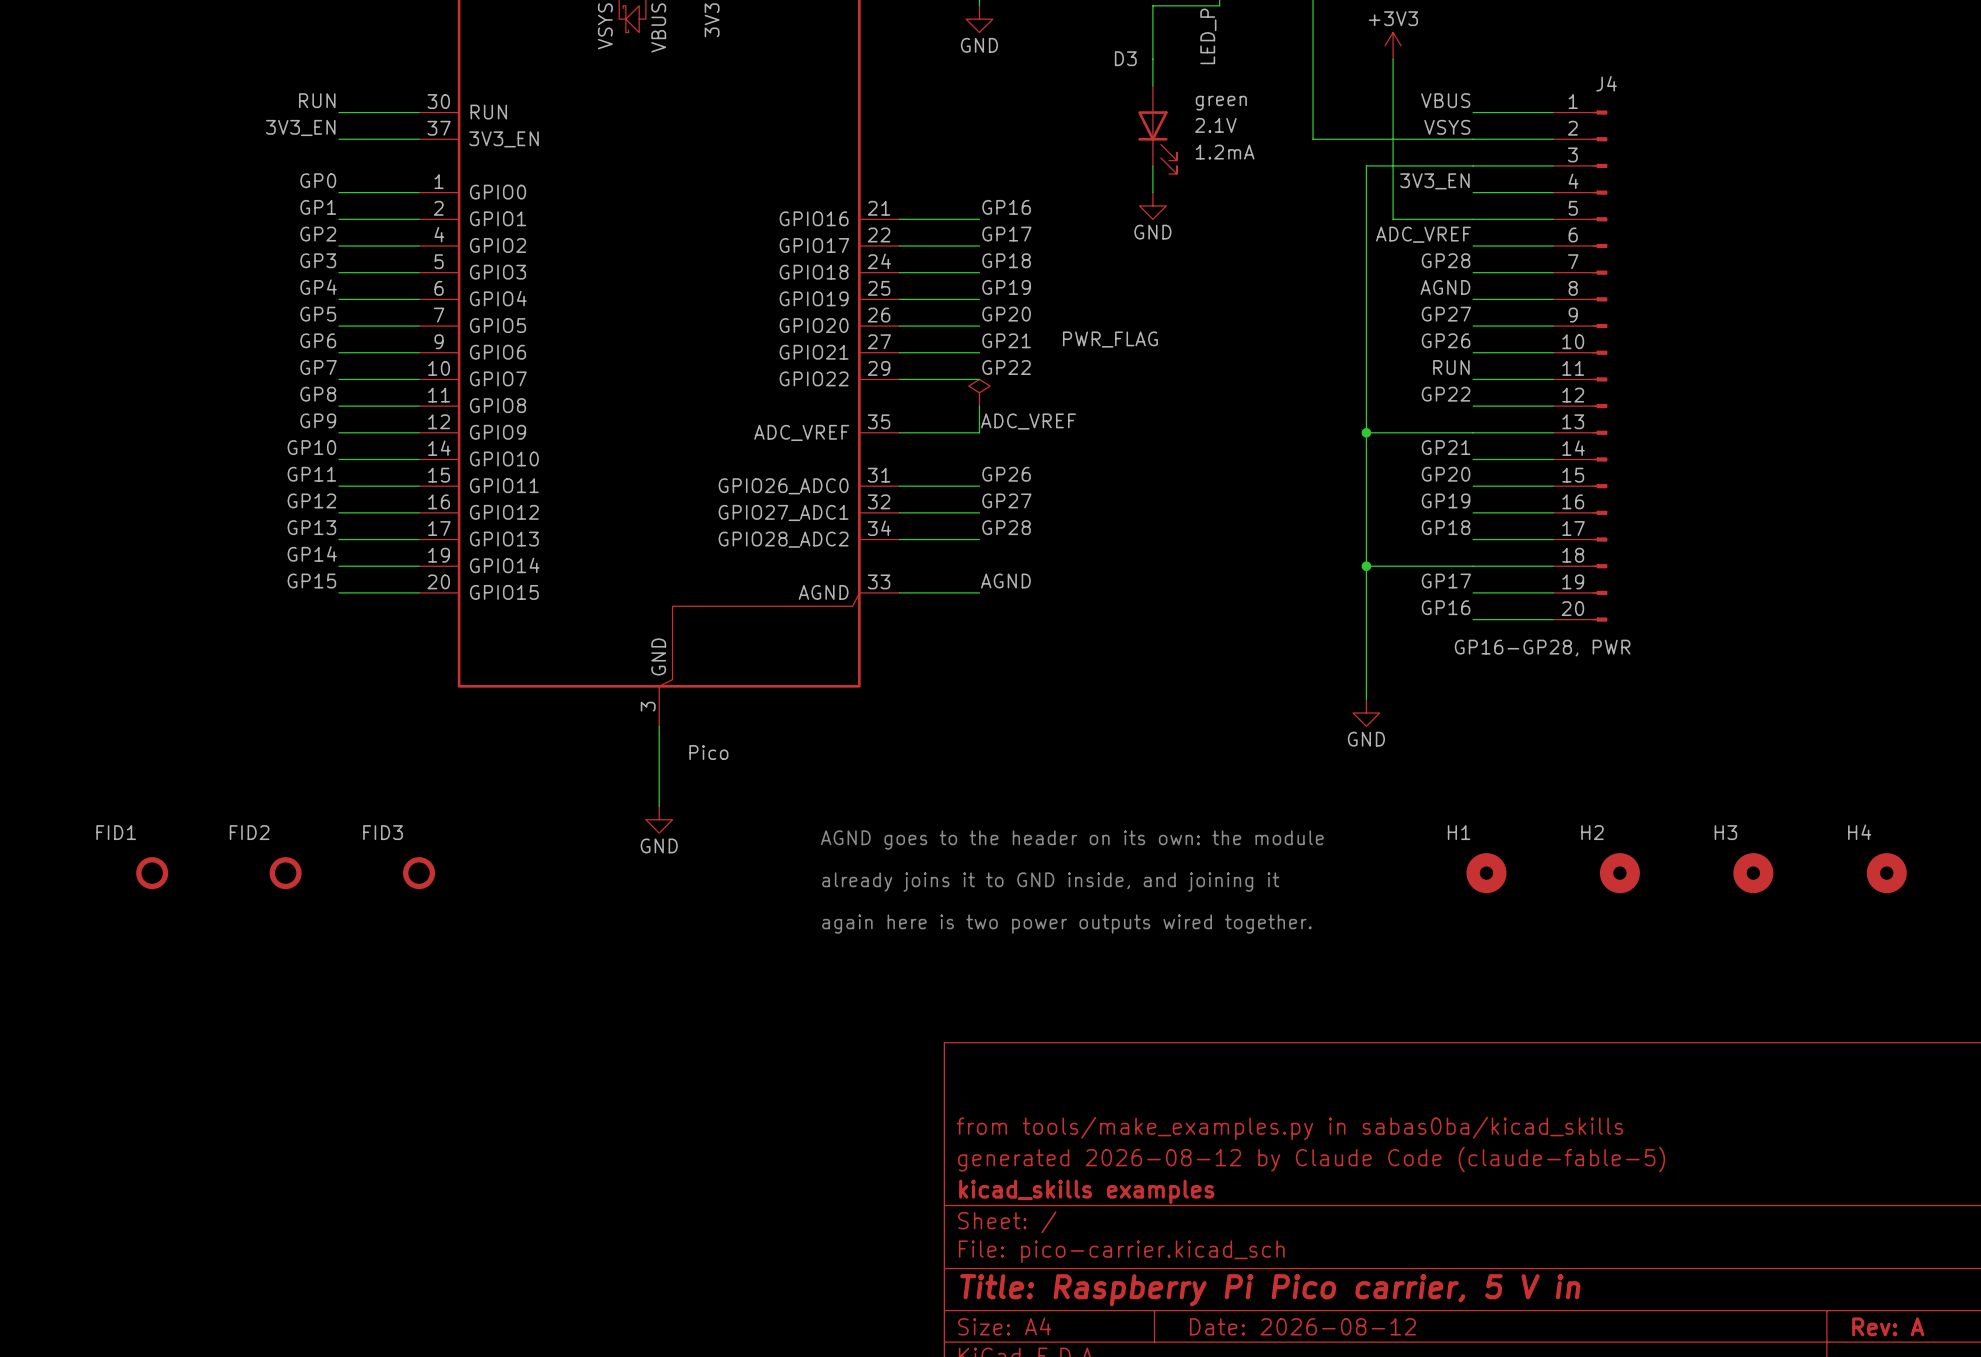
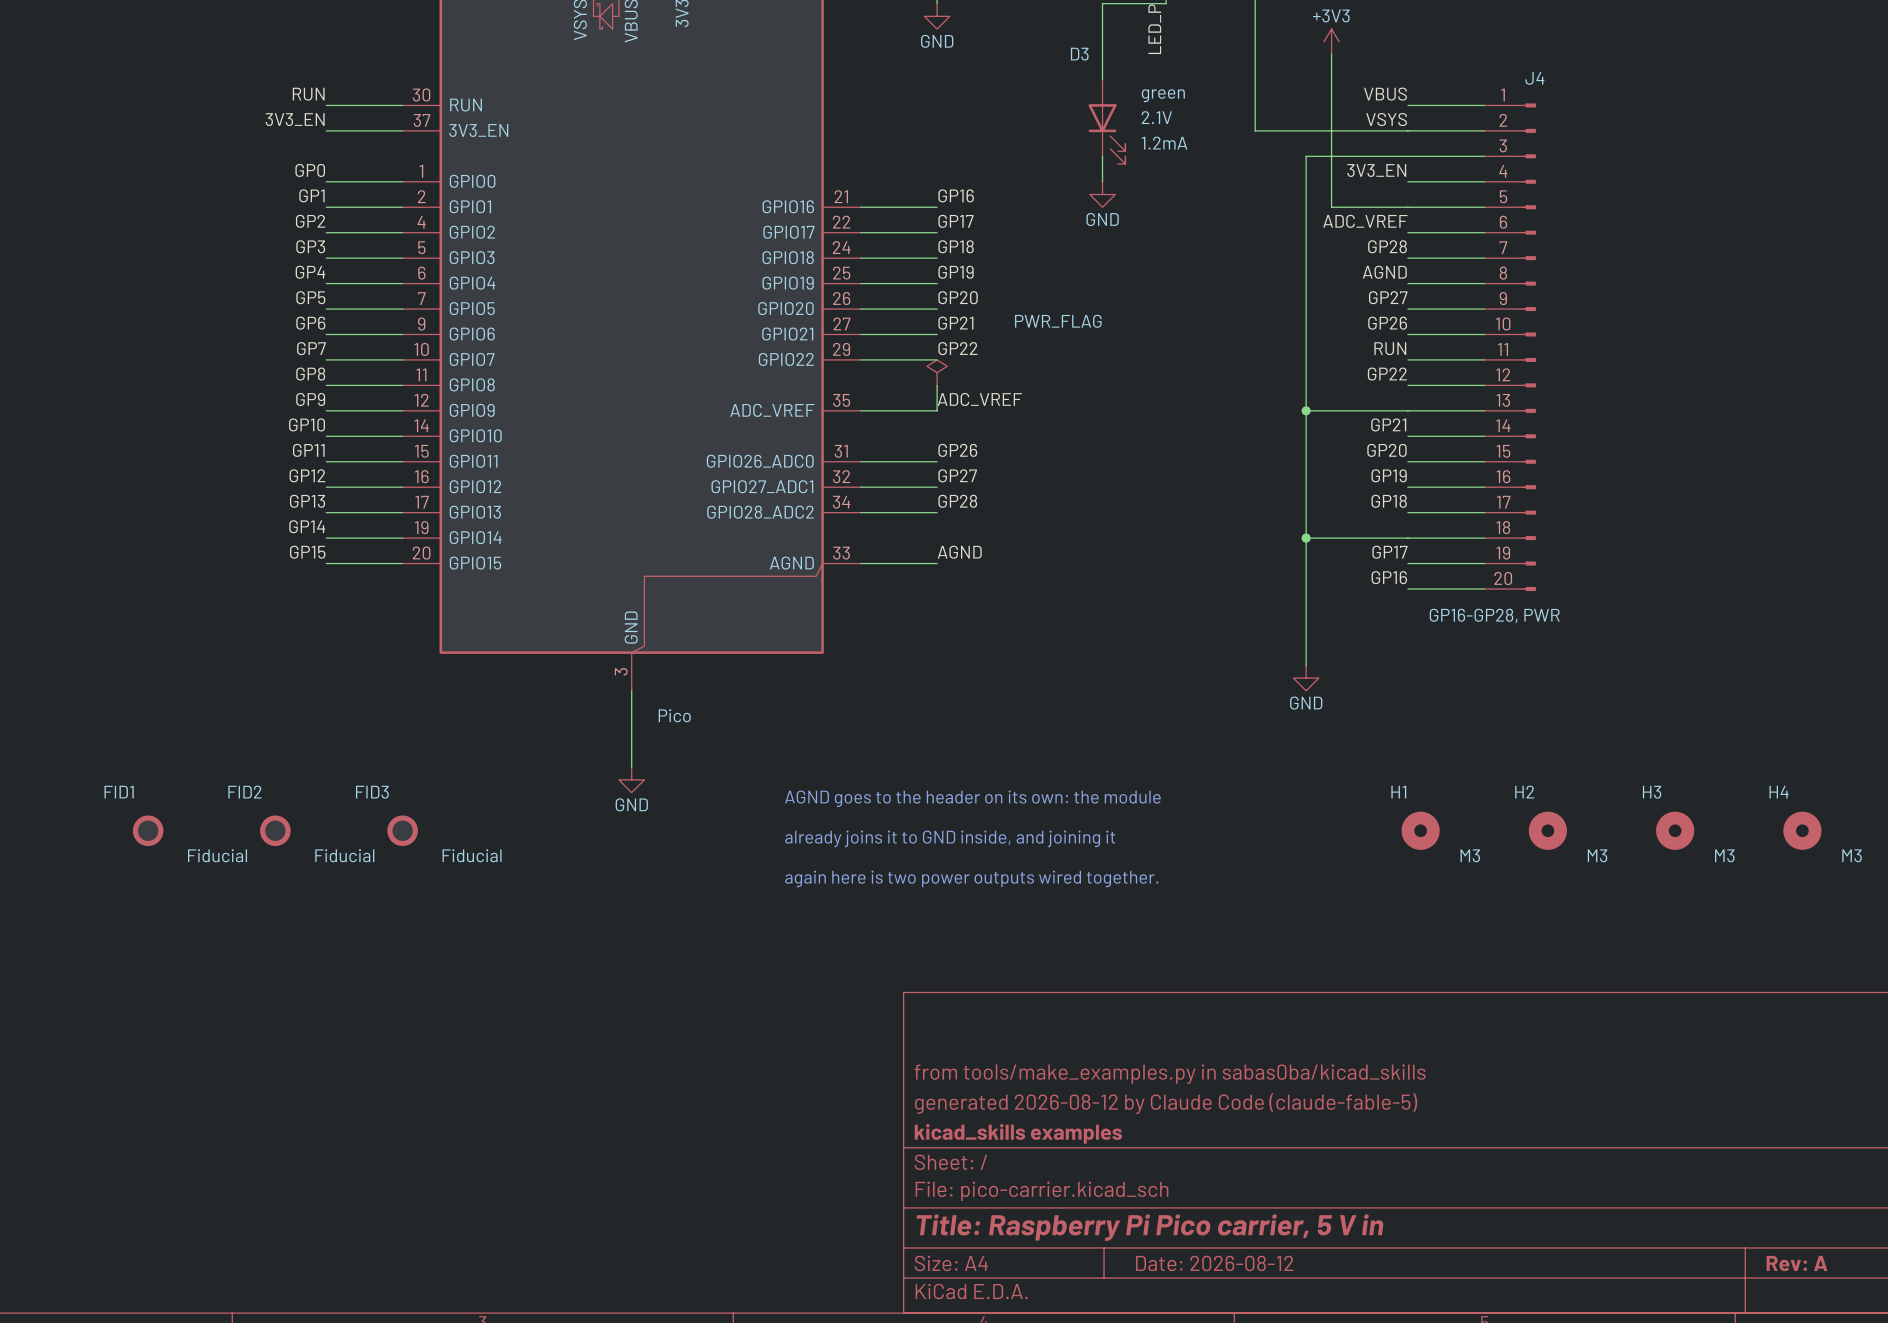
FID1 value: none -> Fiducial (217, 855)
FID2 value: none -> Fiducial (344, 855)
FID3 value: none -> Fiducial (472, 855)
H1 value: none -> M3 (1470, 855)
H2 value: none -> M3 (1597, 855)
H3 value: none -> M3 (1724, 855)
H4 value: none -> M3 (1852, 855)

